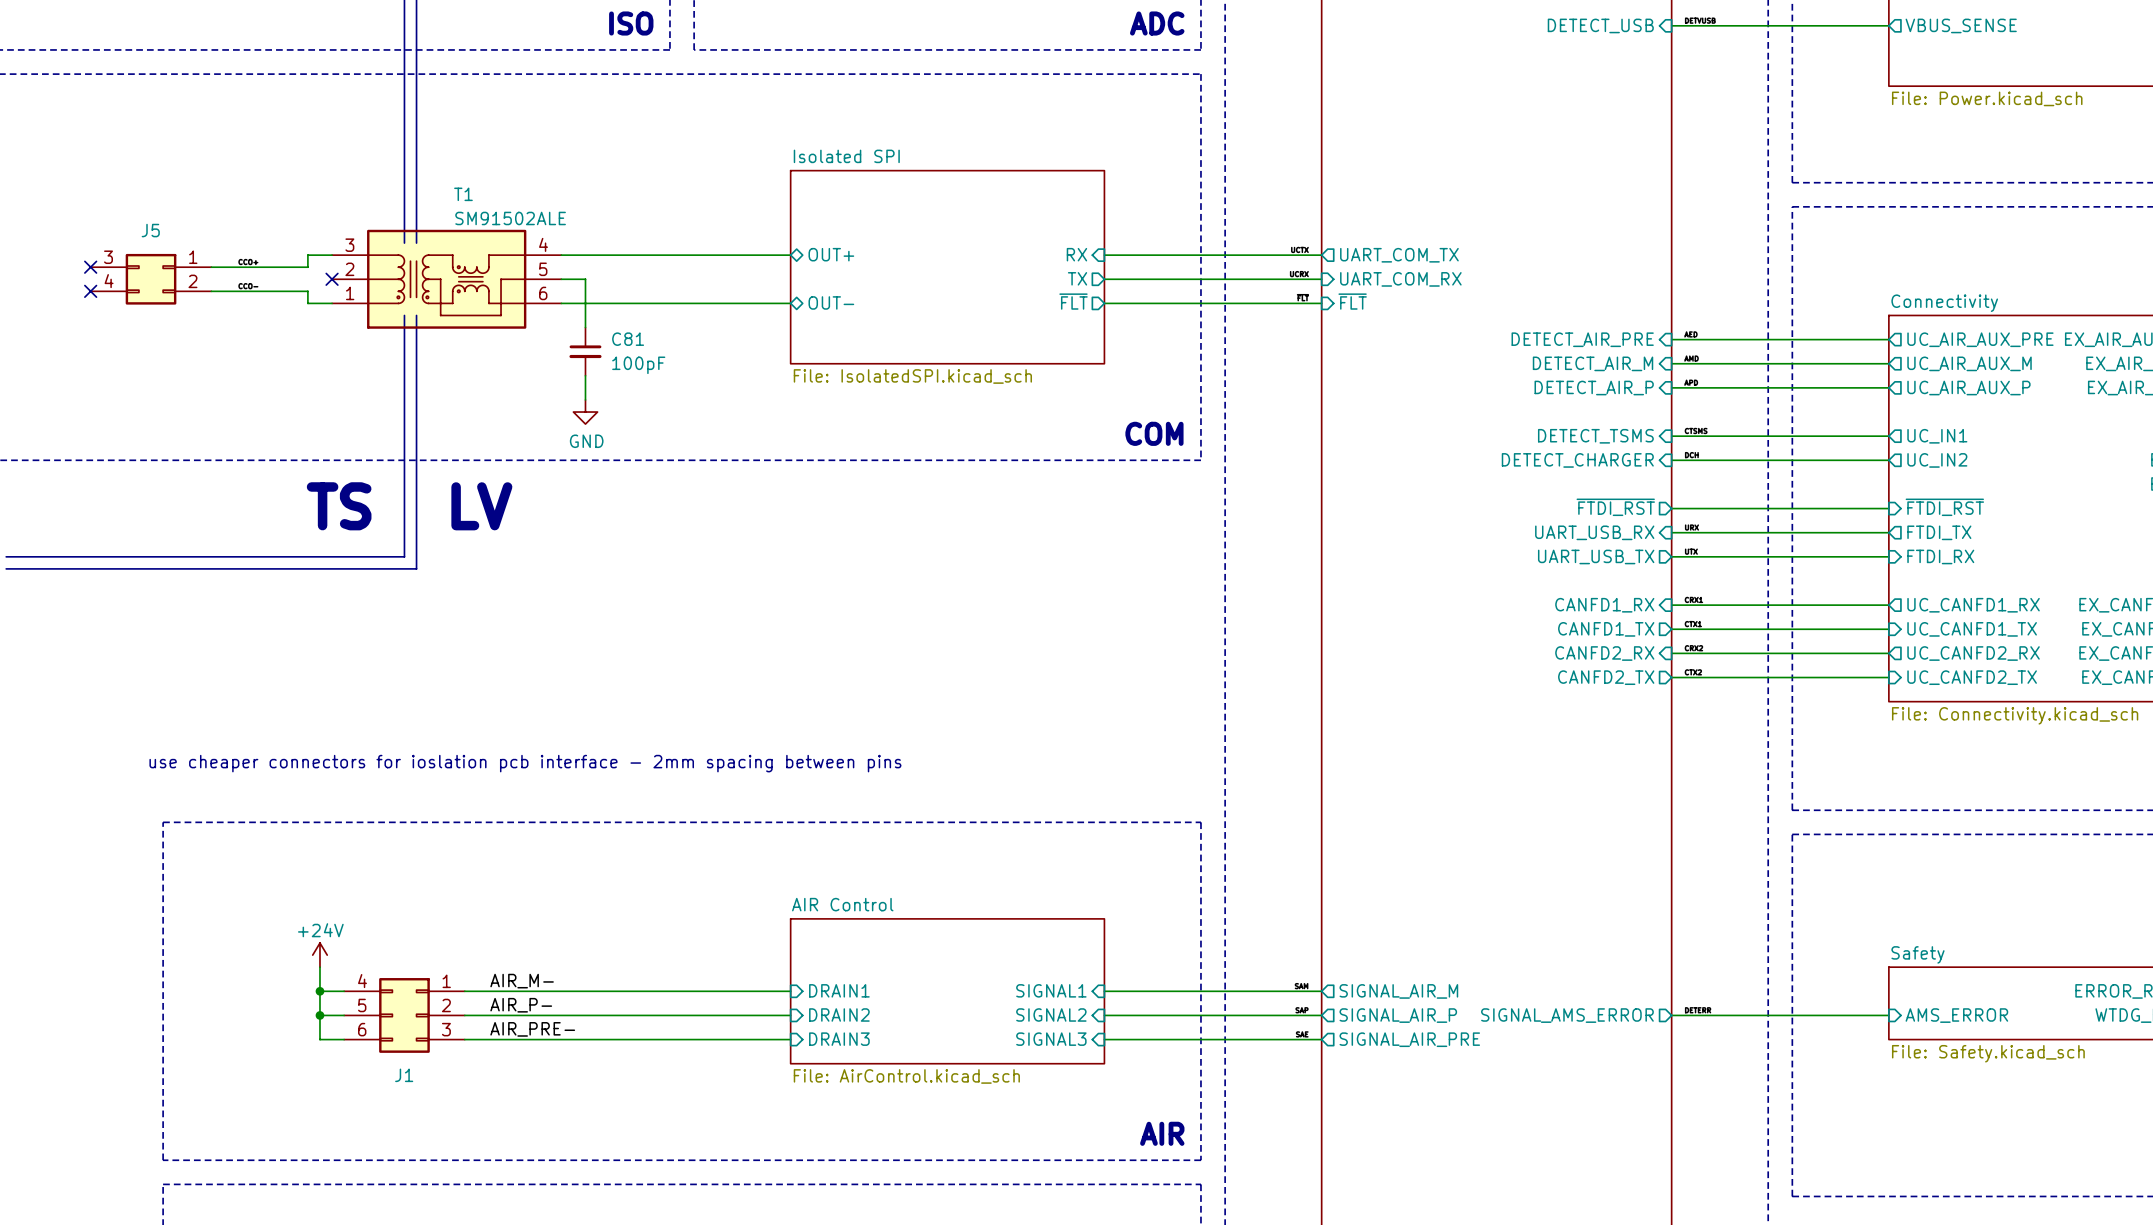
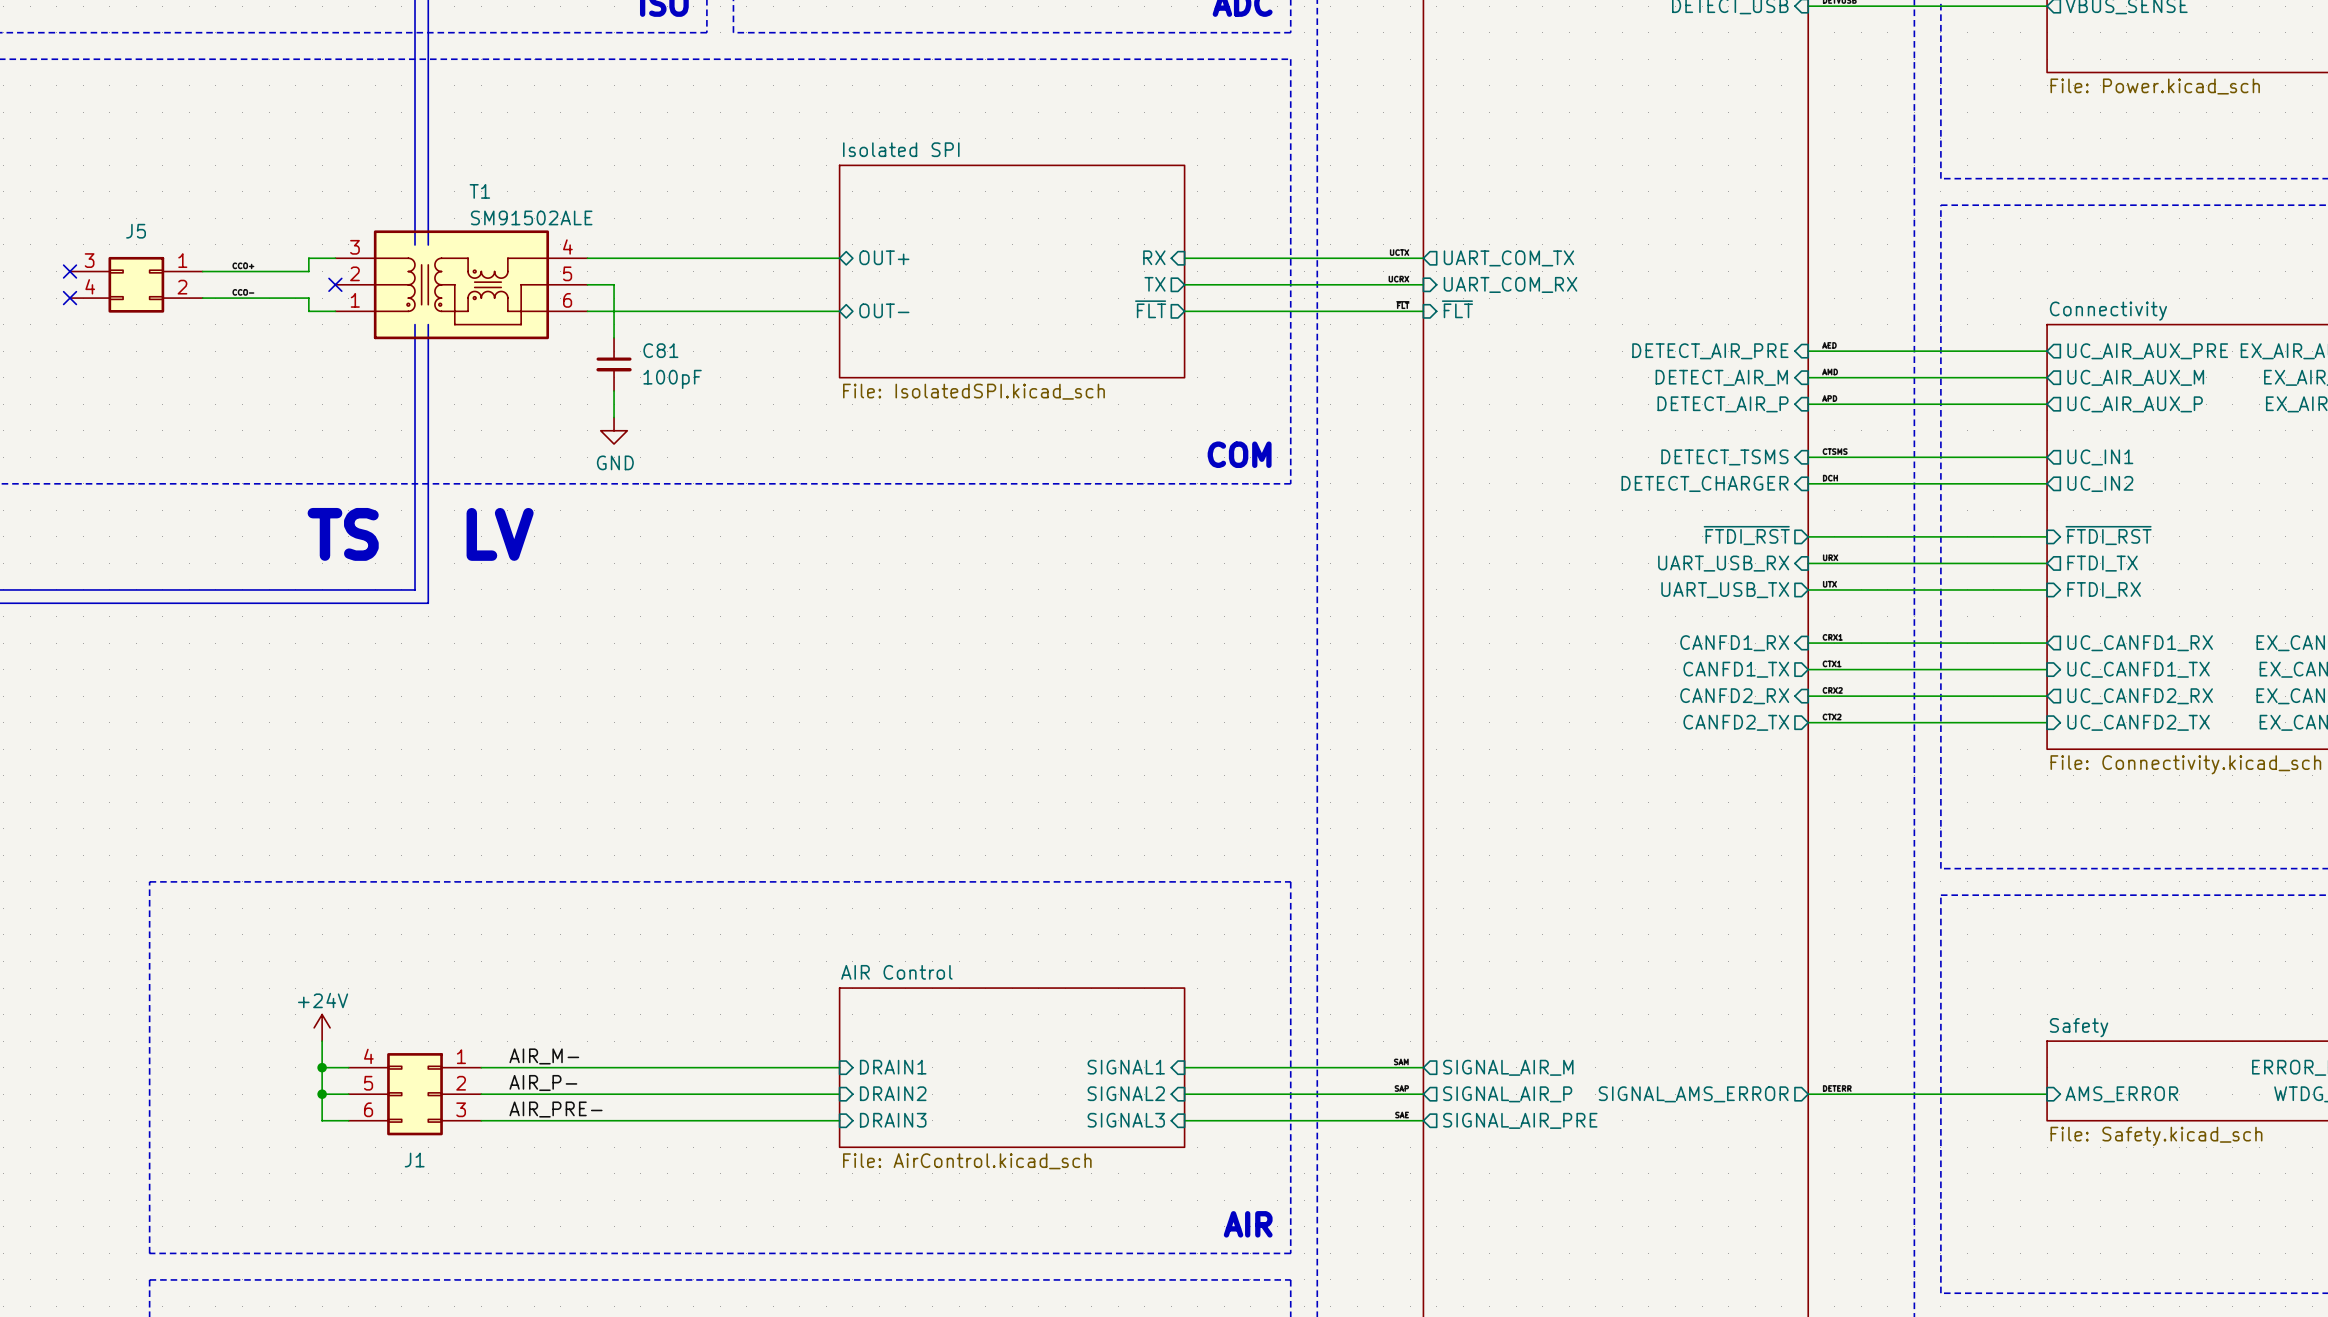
text: use cheaper connectors for ioslation pcb interface - 2mm spacing between pins (525, 763) -> none

